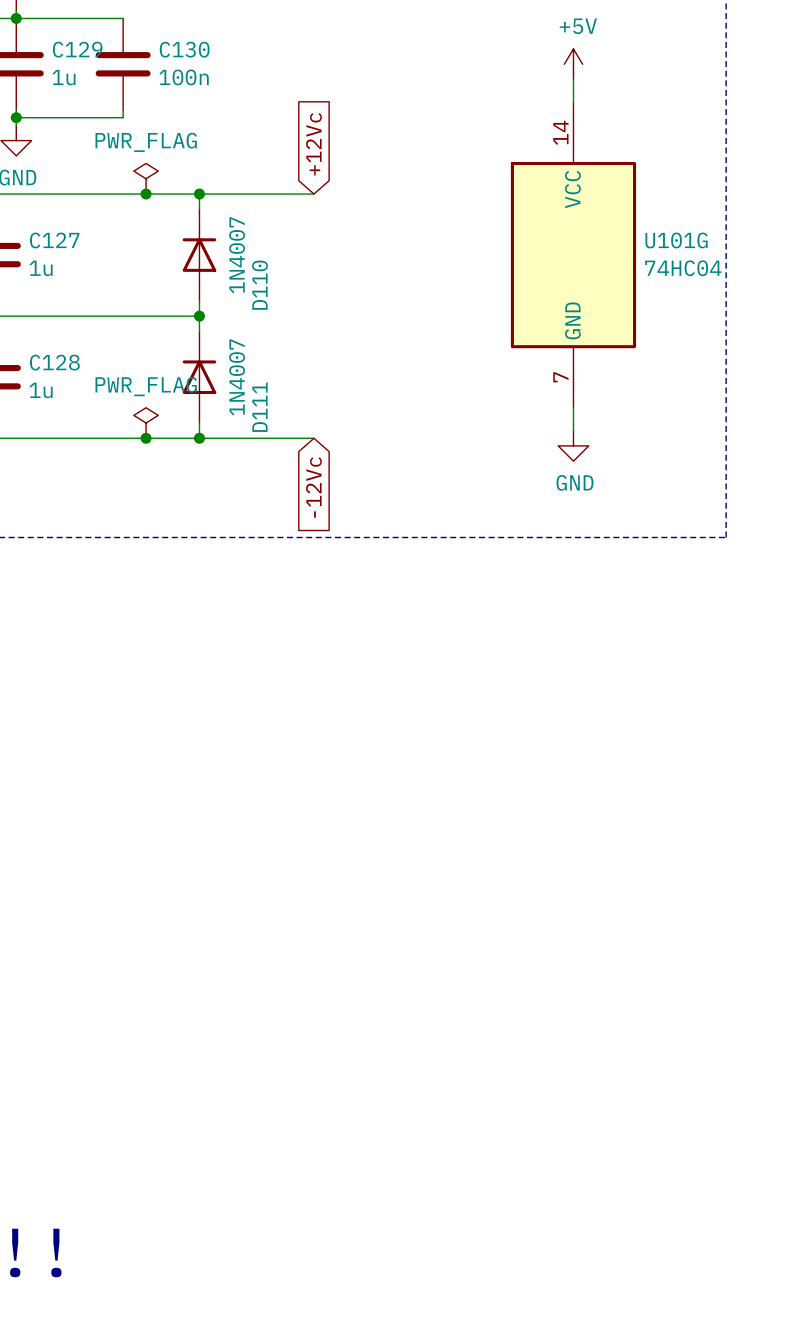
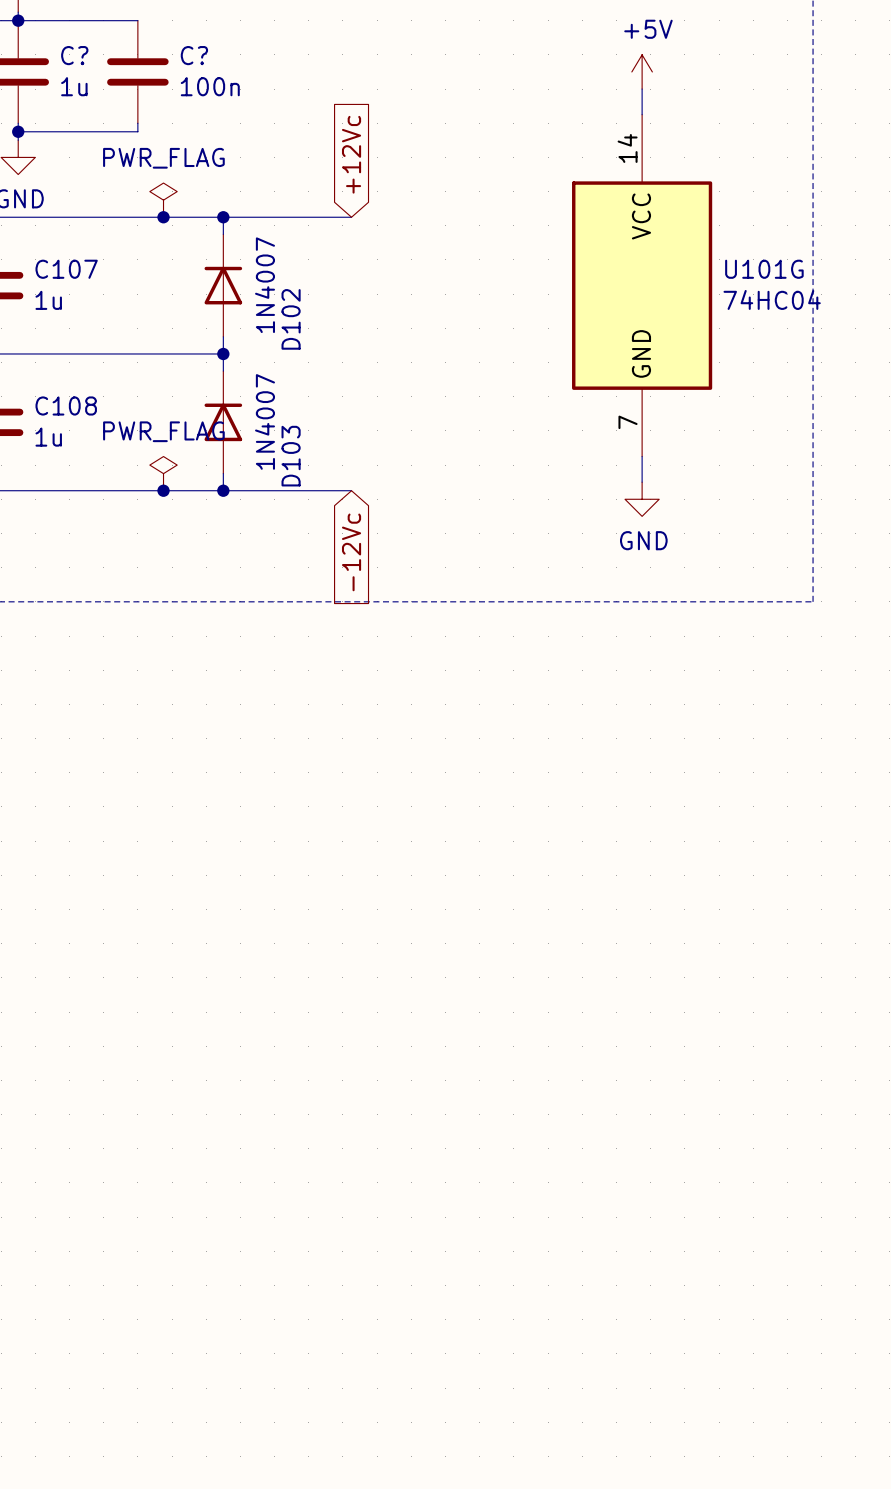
C129 name: C129 (77, 49) -> C? (74, 55)
C130 name: C130 (184, 49) -> C? (194, 55)
C127 name: C127 (54, 240) -> C107 (66, 269)
D110 name: D110 (259, 285) -> D102 (291, 319)
C128 name: C128 (54, 362) -> C108 (66, 405)
D111 name: D111 (259, 407) -> D103 (291, 456)

